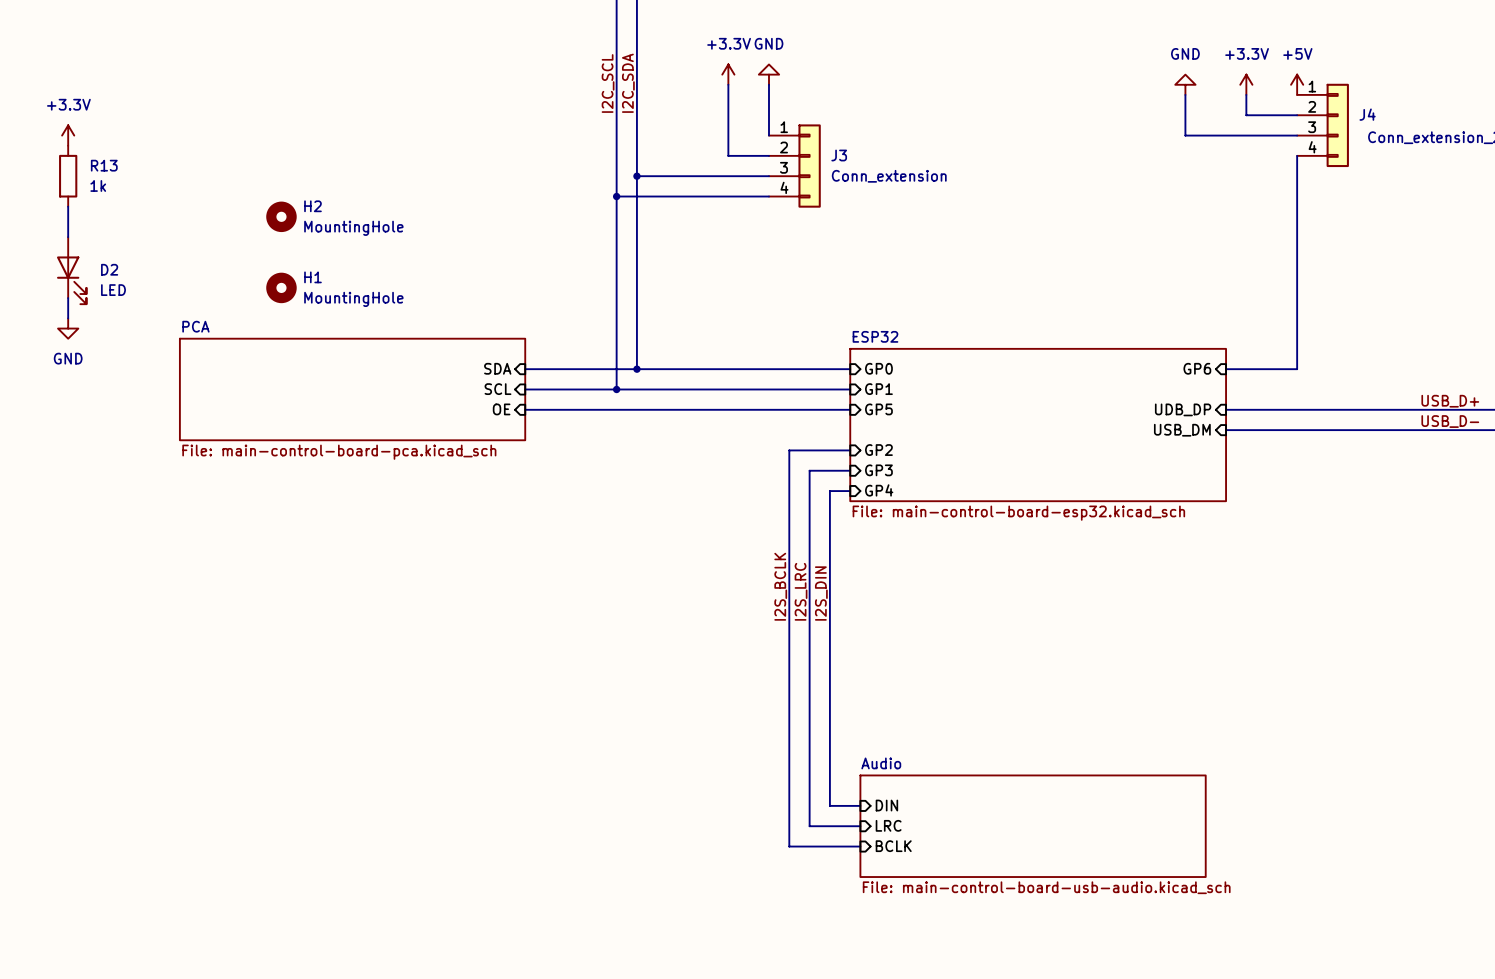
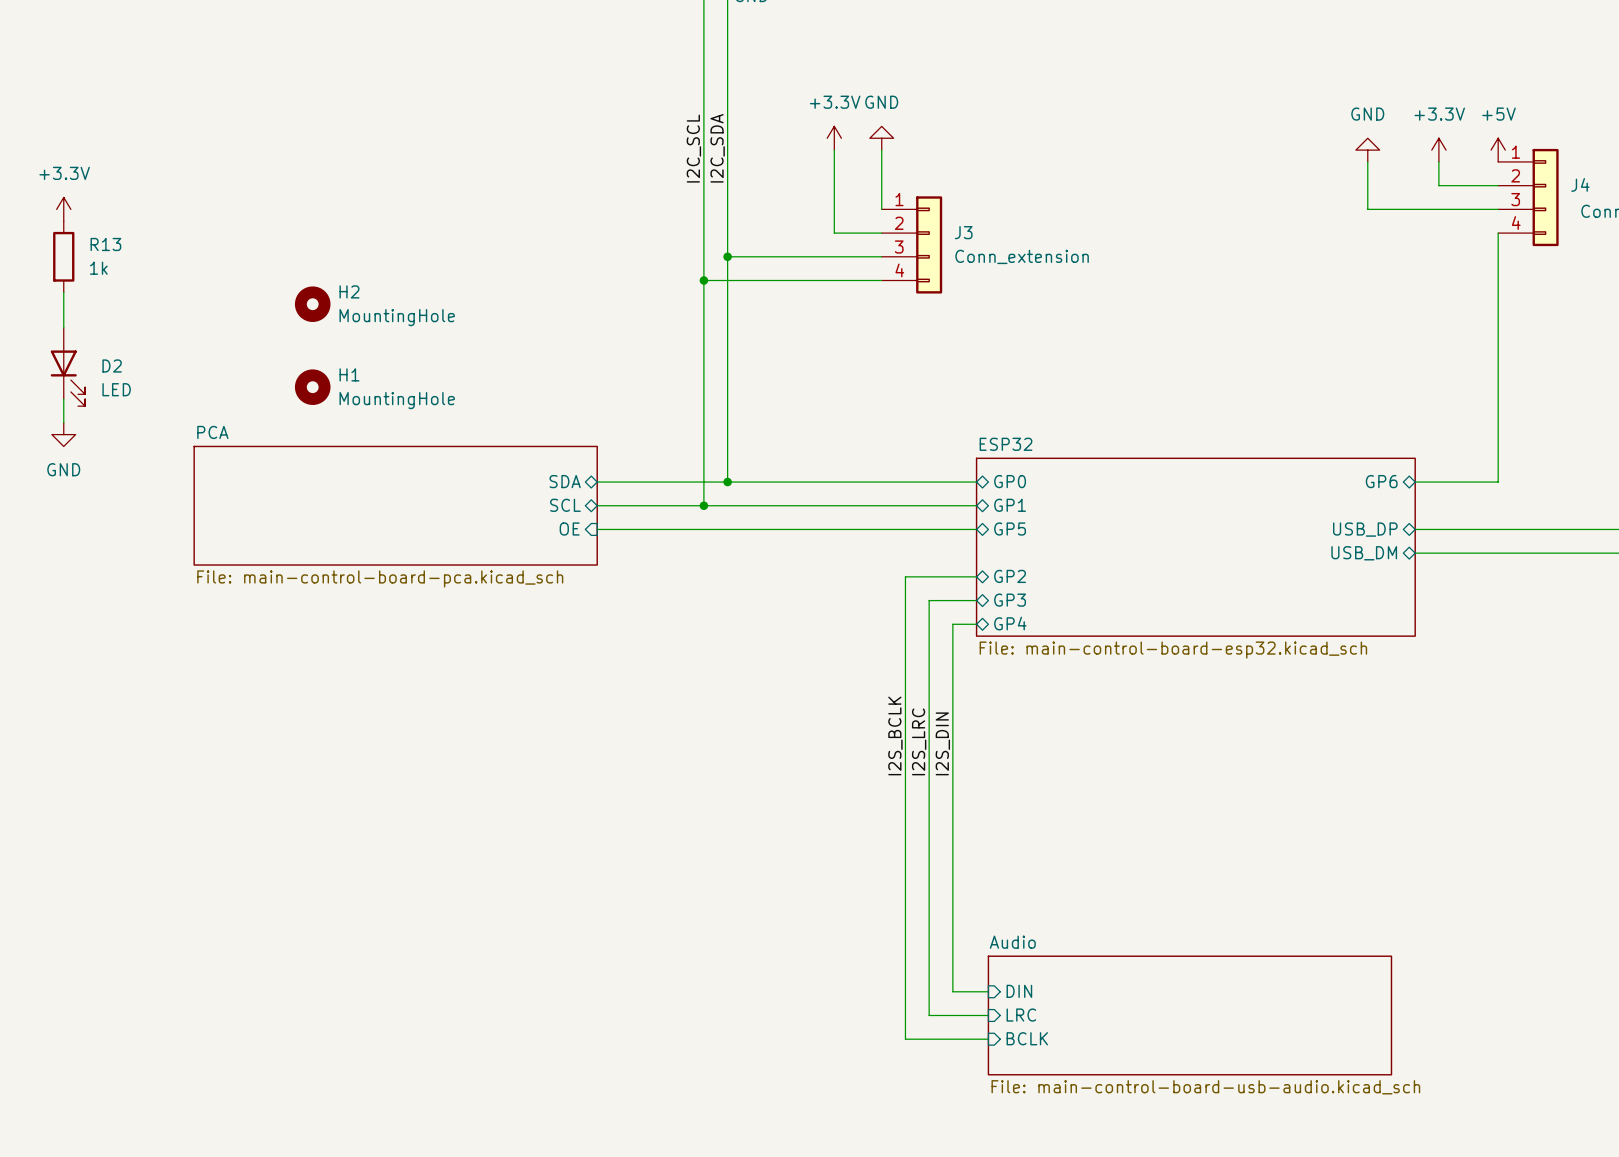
sheet pin shape: input (497, 368) -> bidirectional (565, 481)
sheet pin shape: input (878, 368) -> bidirectional (1010, 481)
sheet pin shape: input (1197, 368) -> bidirectional (1381, 481)
sheet pin shape: input (497, 389) -> bidirectional (565, 505)
sheet pin shape: input (878, 389) -> bidirectional (1010, 505)
sheet pin shape: input (878, 409) -> bidirectional (1010, 529)
sheet pin shape: input (1183, 409) -> bidirectional (1365, 529)
sheet pin: UDB_DP (1183, 409) -> USB_DP (1365, 529)
sheet pin shape: input (1182, 430) -> bidirectional (1364, 553)
sheet pin shape: input (878, 450) -> bidirectional (1010, 576)
sheet pin shape: input (878, 470) -> bidirectional (1010, 600)
sheet pin shape: input (879, 490) -> bidirectional (1010, 623)

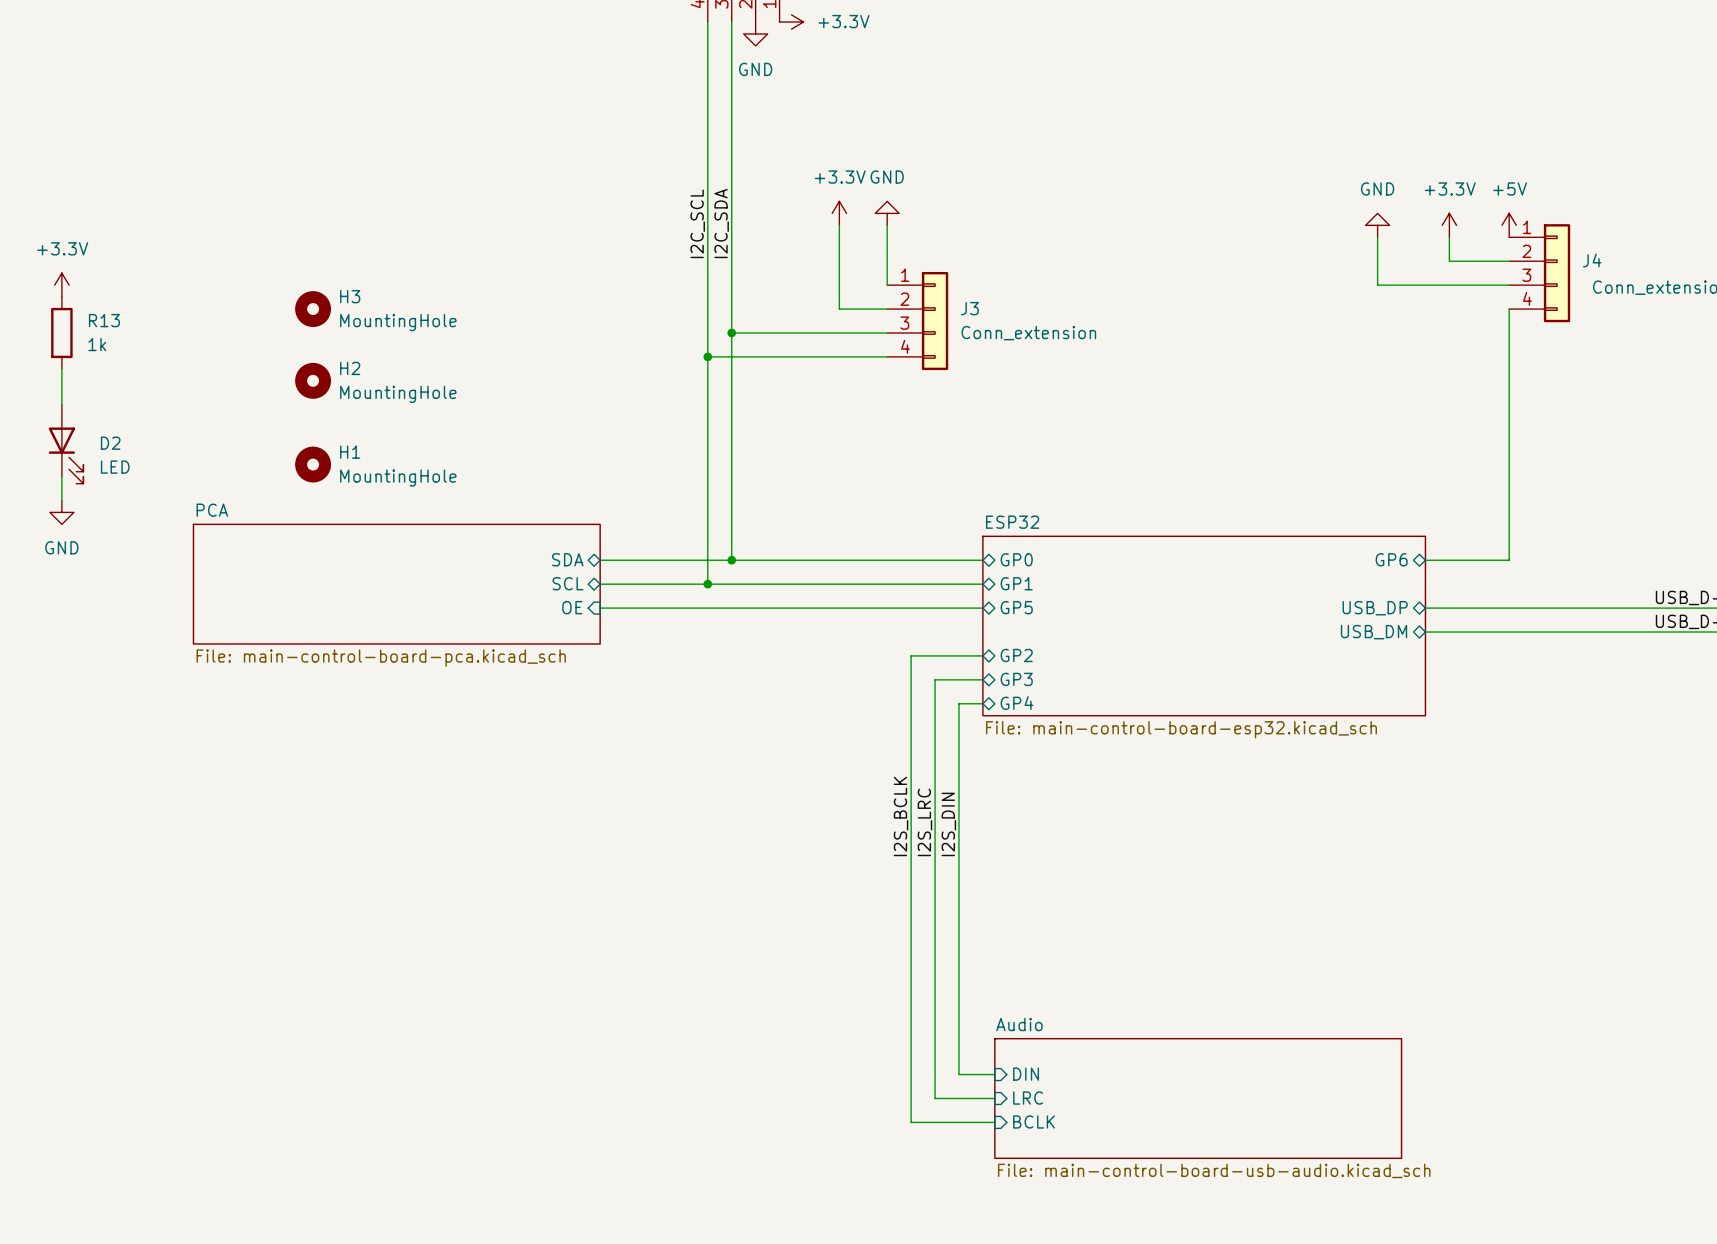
H3: none -> MountingHole (313, 309)

